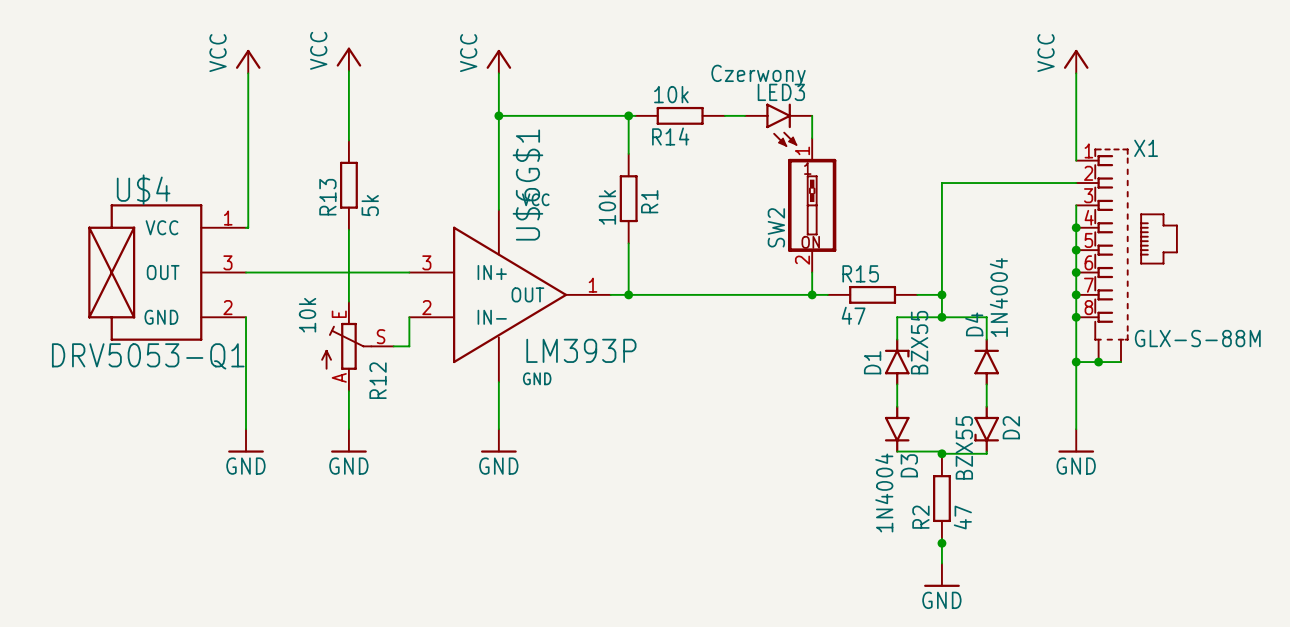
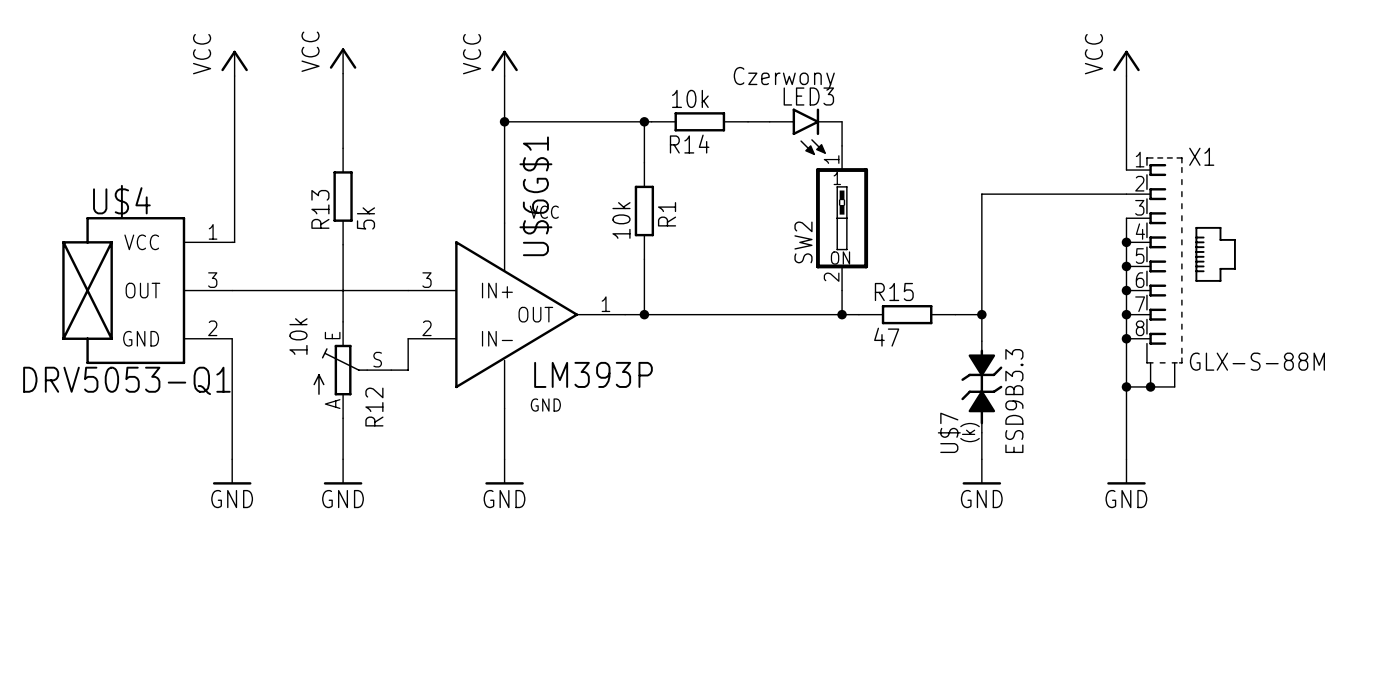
junction: (941, 317) -> none
wire: (897, 339) (897, 317) (986, 317) (986, 339) -> none
D1: BZX55 (897, 362) -> none
U$7: none -> ESD9B3.3 (981, 386)
D4: 1N4004 (986, 362) -> none
wire: (897, 384) (897, 406) -> none
wire: (986, 384) (986, 406) -> none
D3: 1N4004 (897, 429) -> none
D2: BZX55 (986, 429) -> none
wire: (897, 451) (941, 451) (941, 453) (986, 453) (986, 451) -> none
junction: (941, 453) -> none
R2: 47 (941, 498) -> none
wire: (941, 538) (941, 563) -> (981, 432) (981, 459)
junction: (941, 543) -> none
power symbol position: GND (941, 575) -> GND (981, 471)

